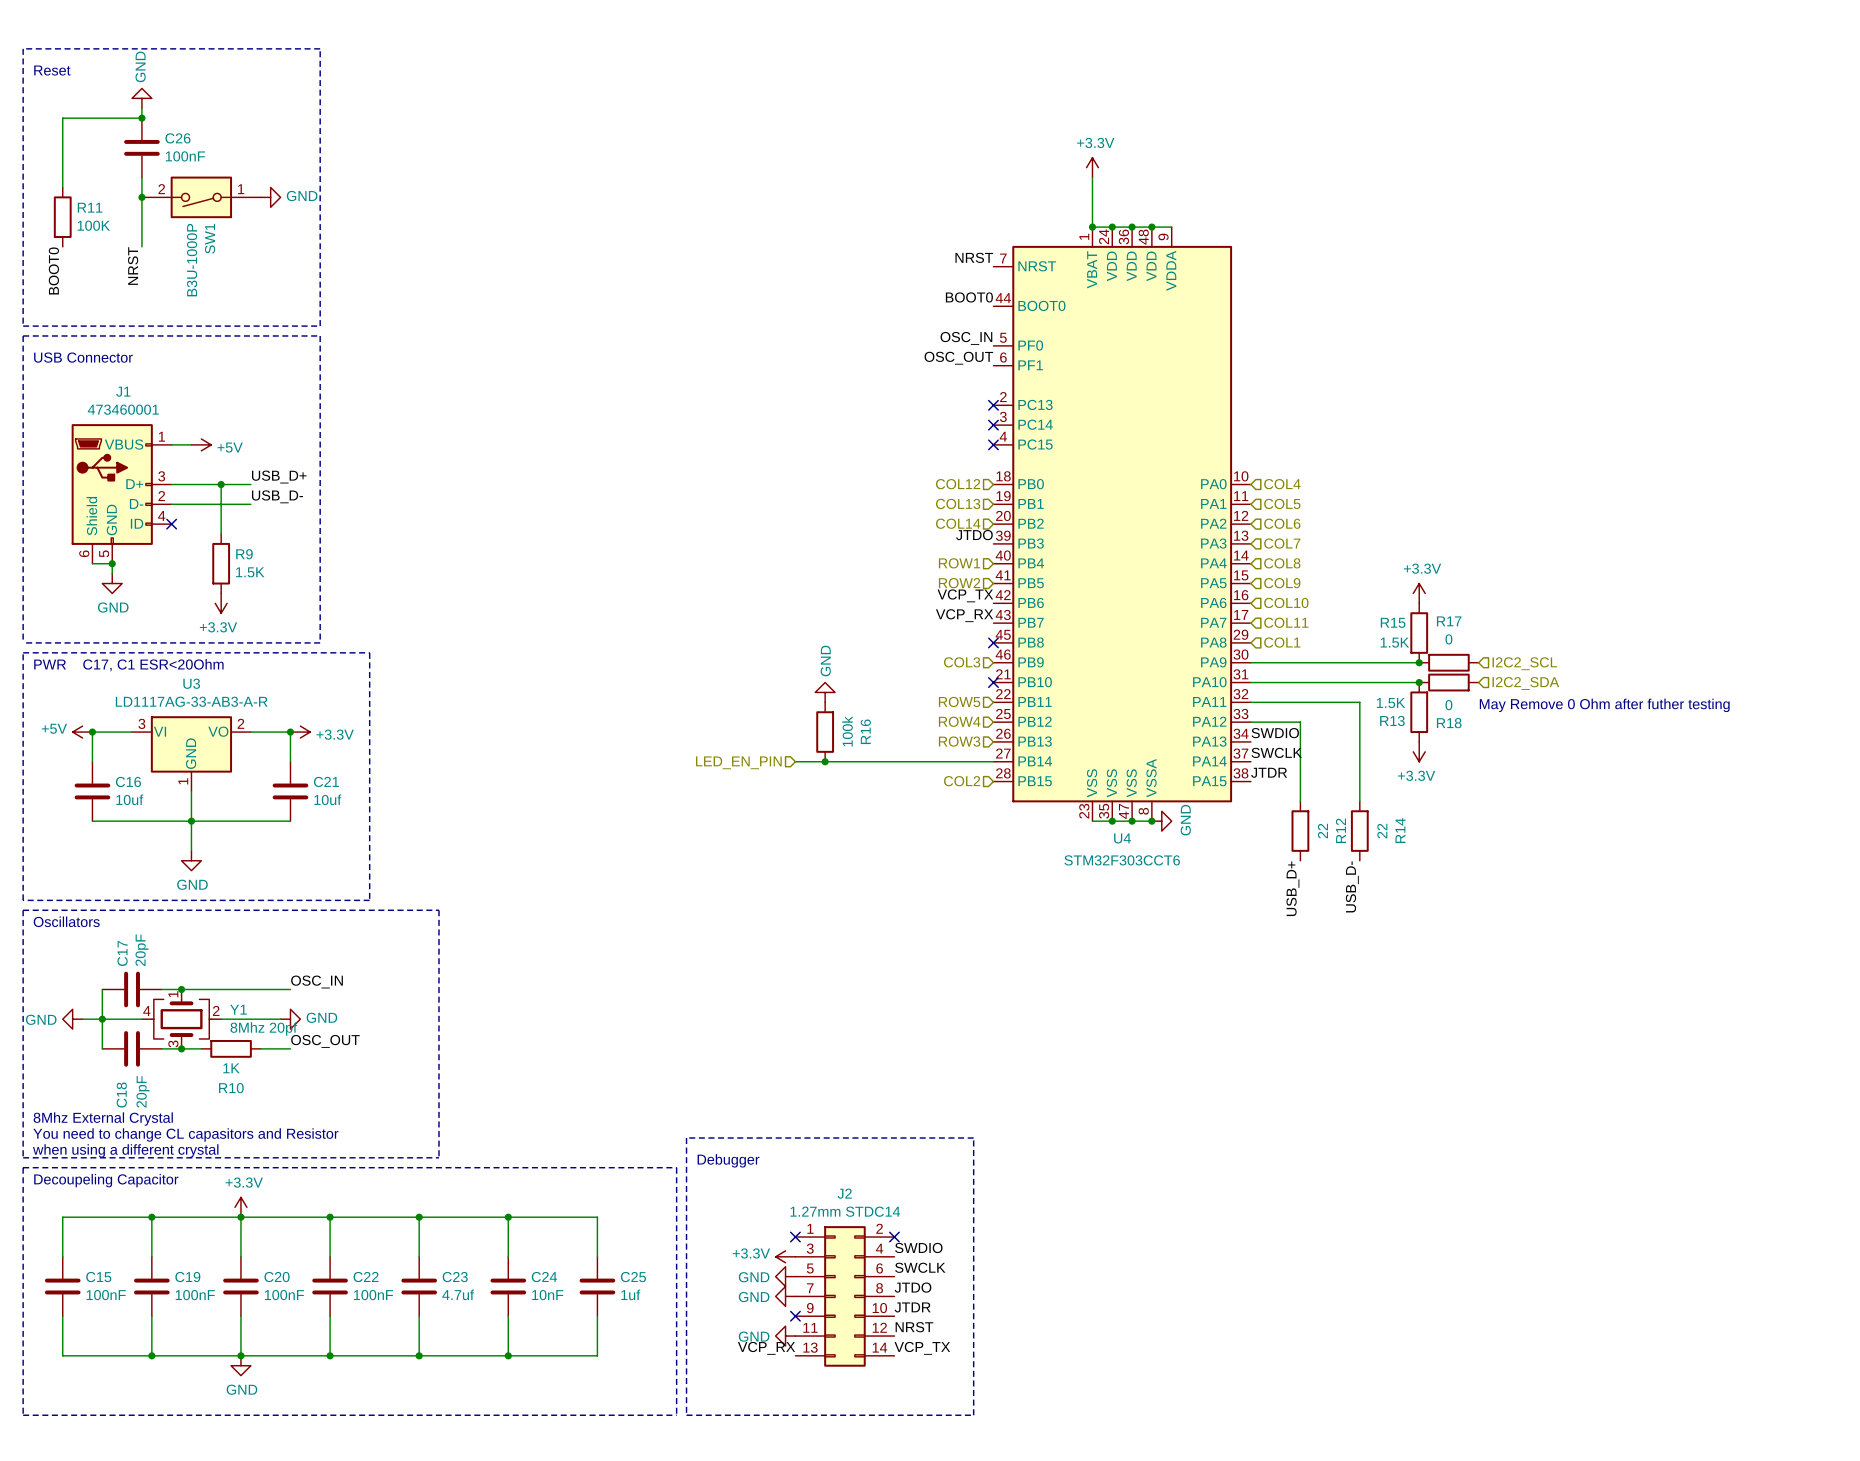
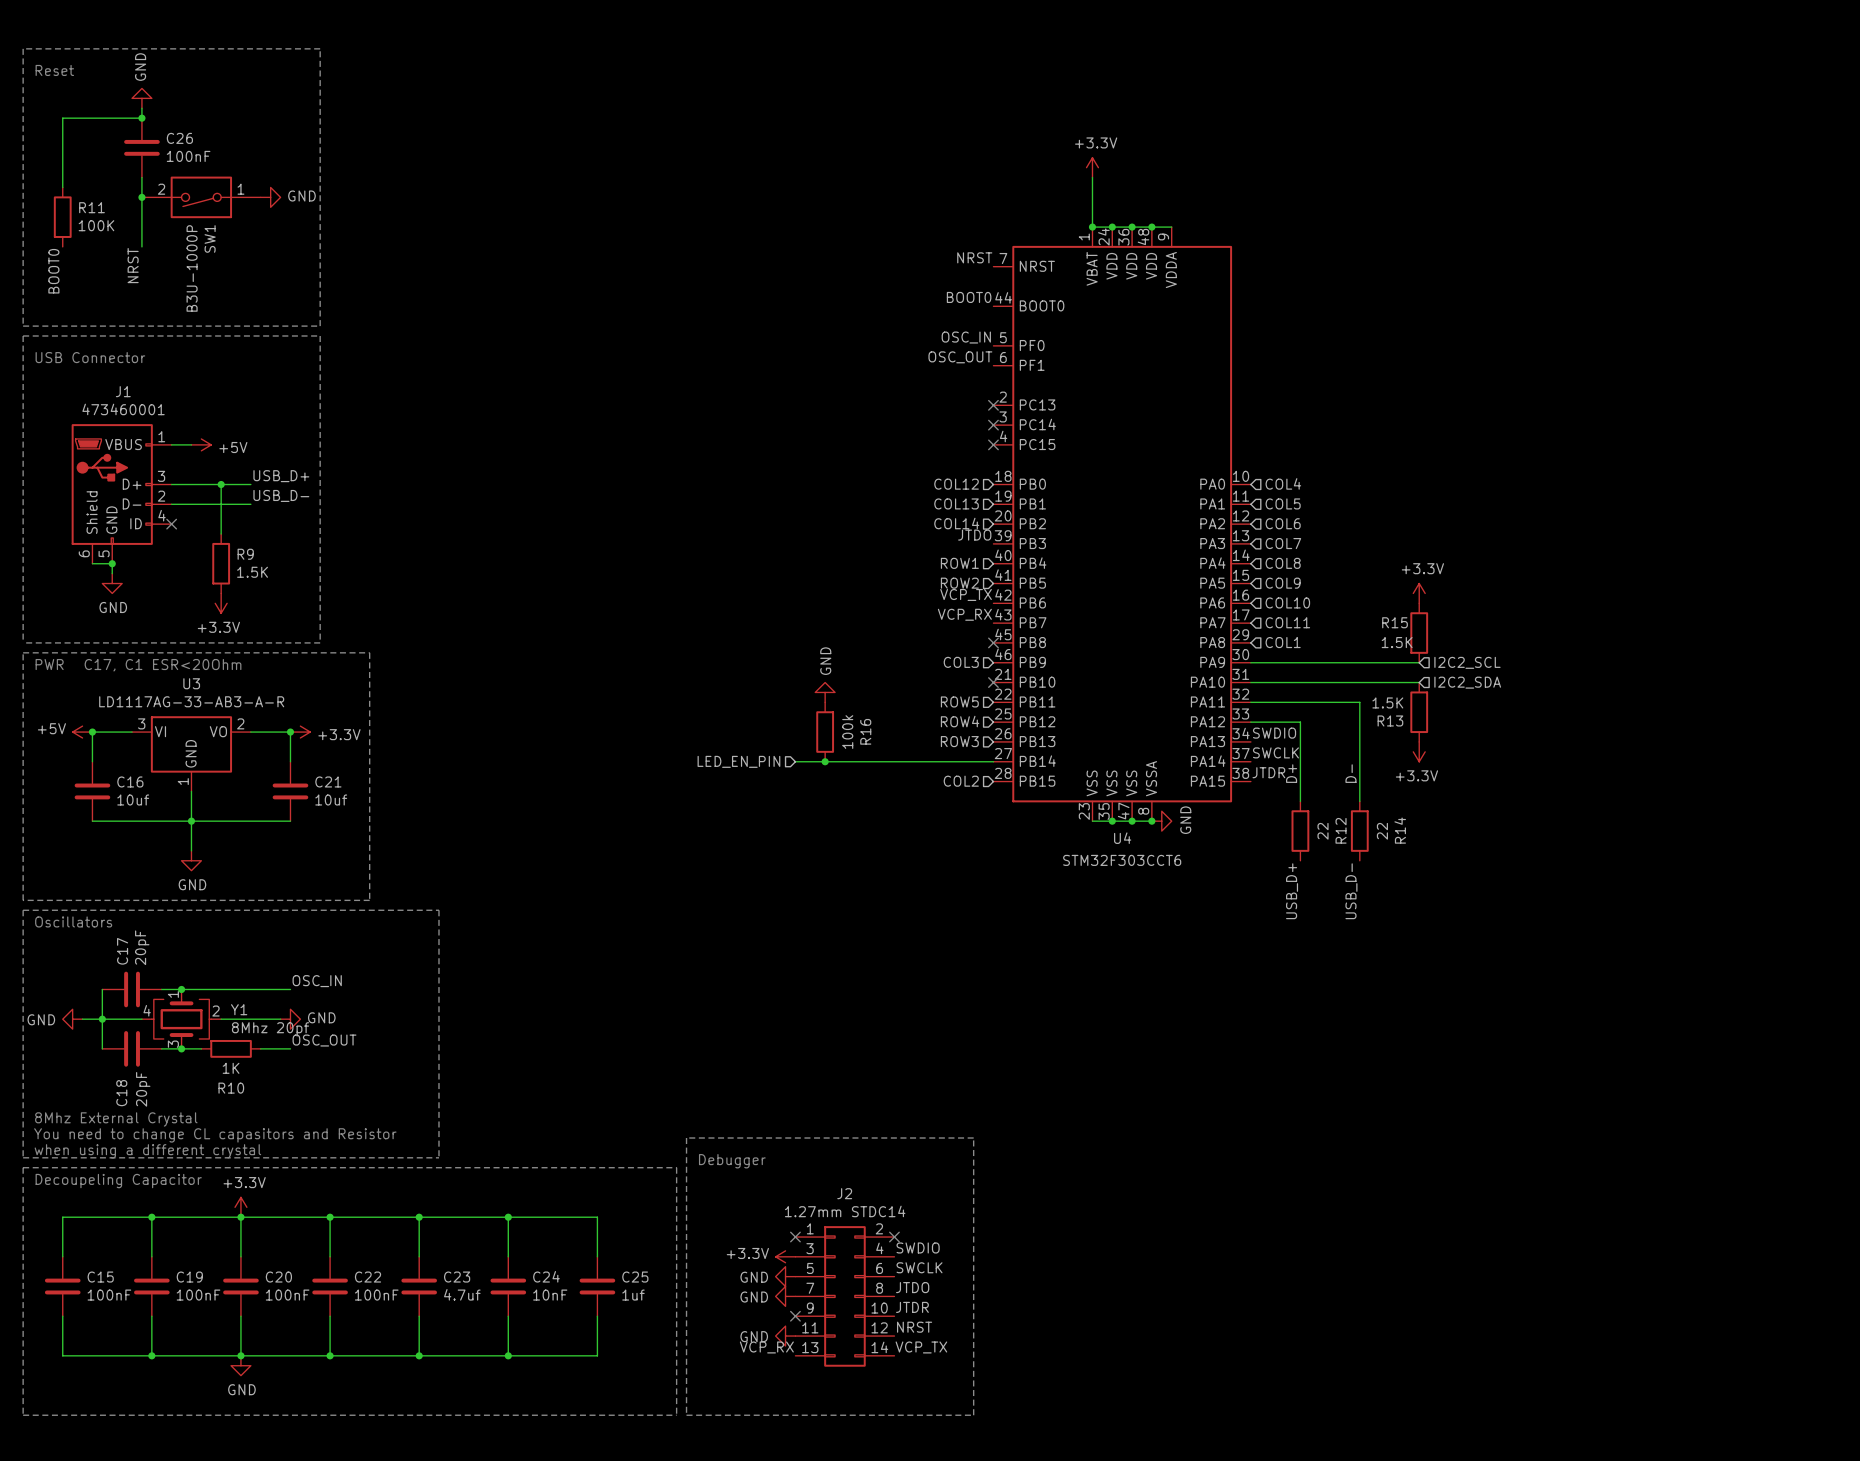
junction: (1419, 662) -> none
R17: 0 (1448, 662) -> none
hierarchical label position: I2C2_SCL (1524, 663) -> I2C2_SCL (1467, 662)
junction: (1419, 682) -> none
R18: 0 (1448, 682) -> none
hierarchical label position: I2C2_SDA (1525, 683) -> I2C2_SDA (1467, 682)
text: May Remove 0 Ohm after futher testing (1604, 705) -> none
label: none -> D- (1350, 773)
label: none -> D+ (1291, 773)

